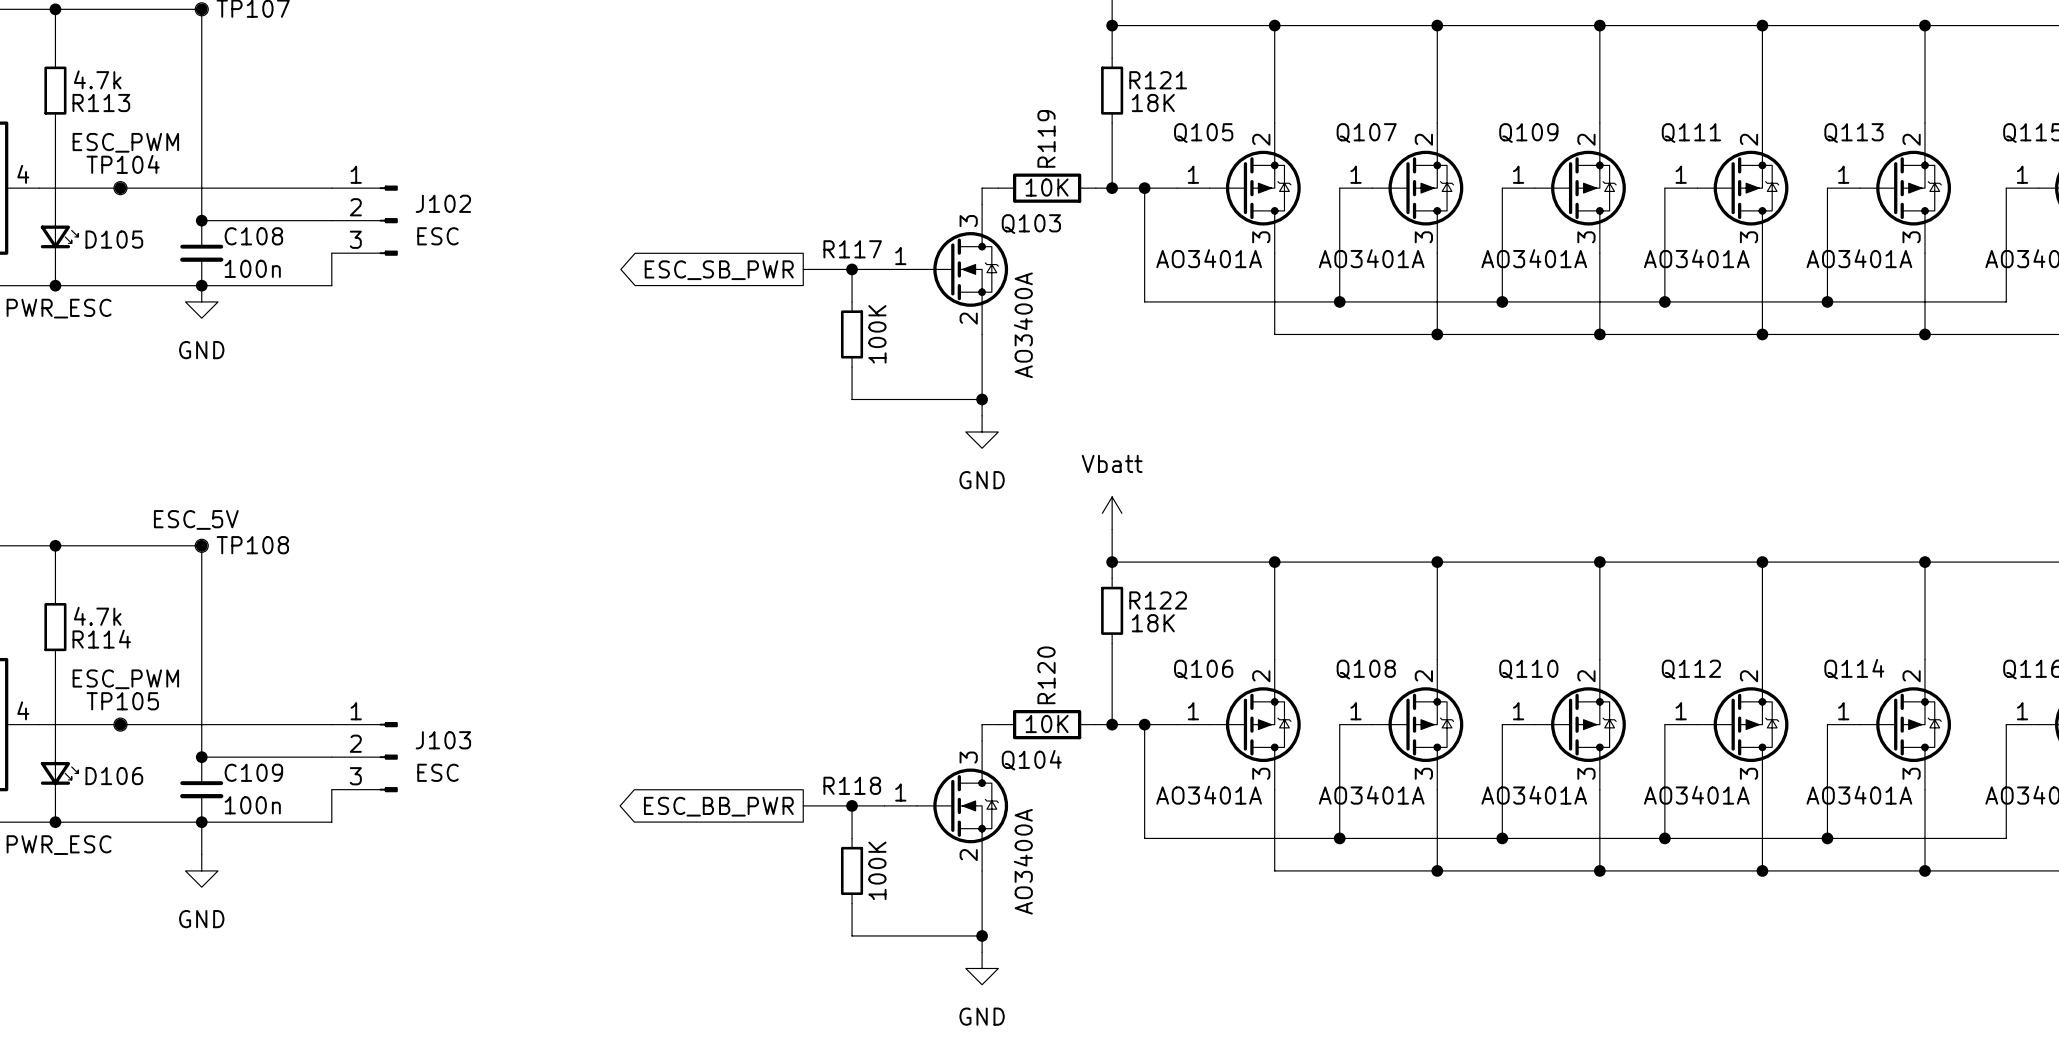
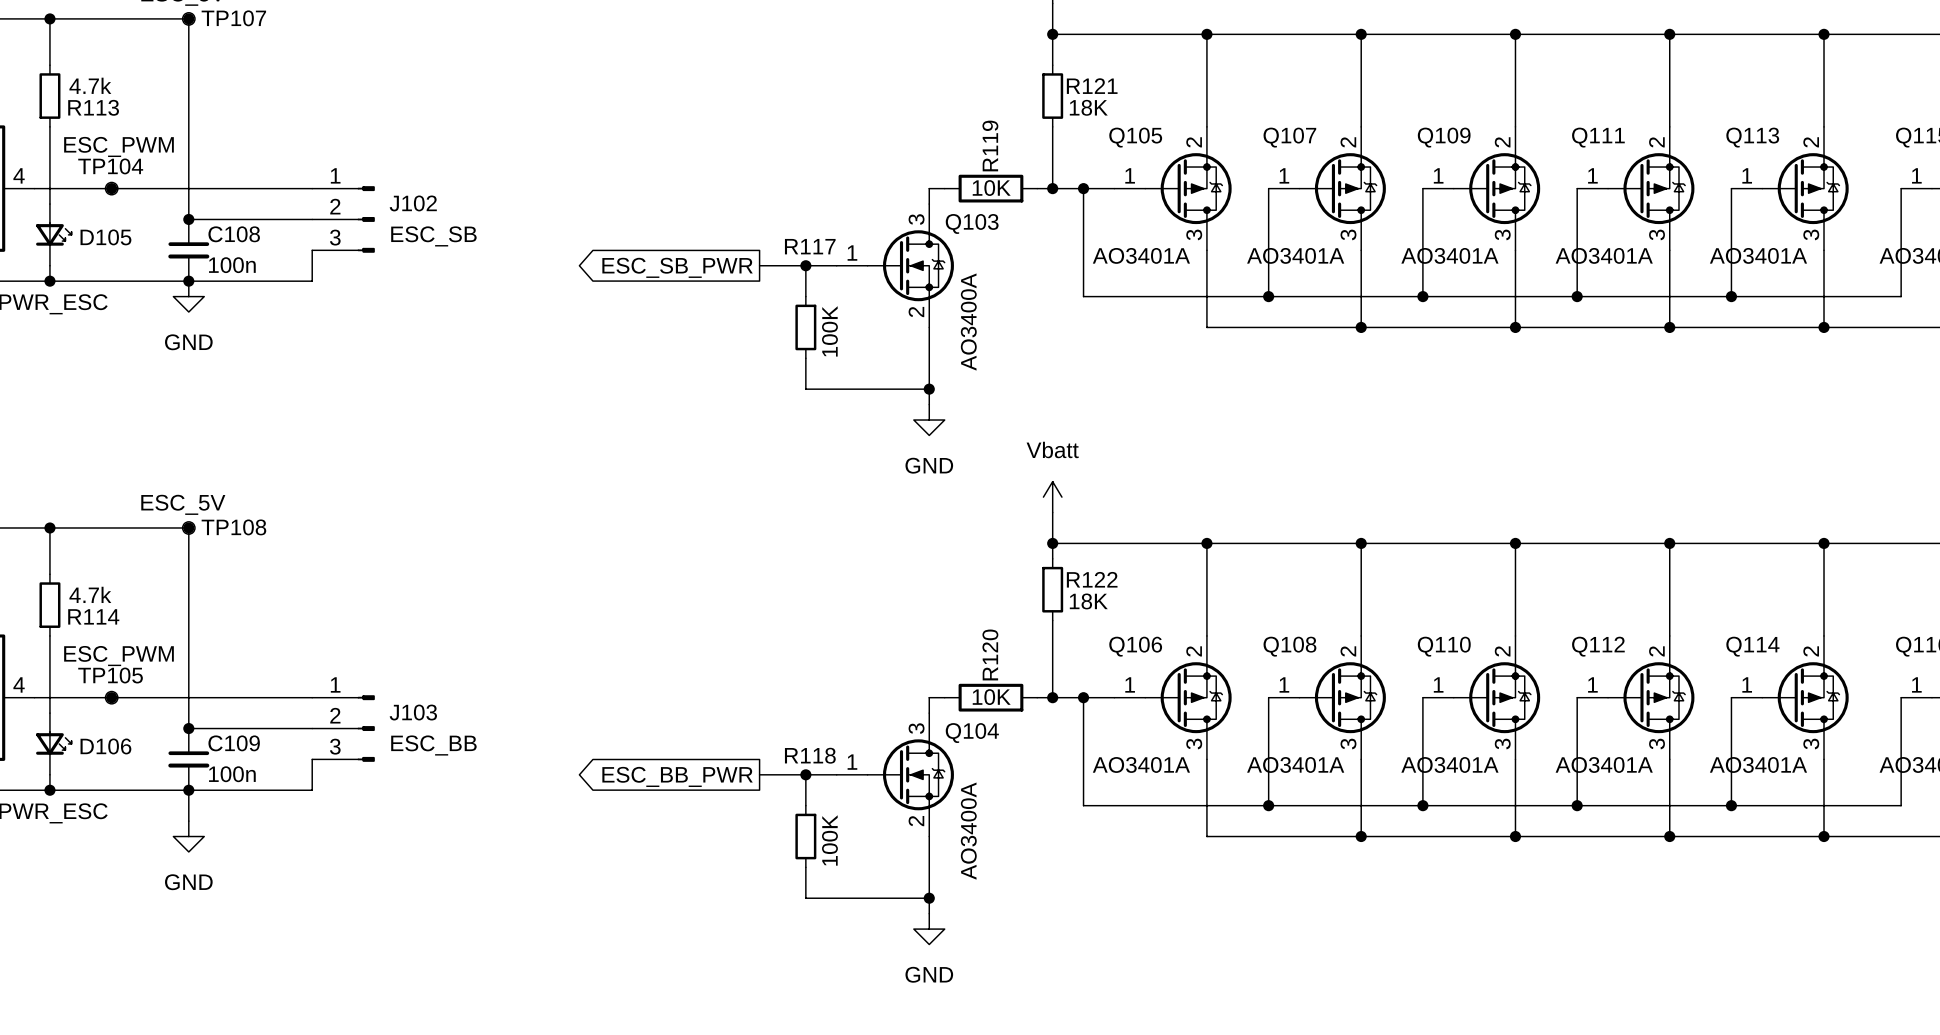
J102 value: ESC (437, 236) -> ESC_SB (433, 236)
J103 value: ESC (437, 772) -> ESC_BB (433, 745)

